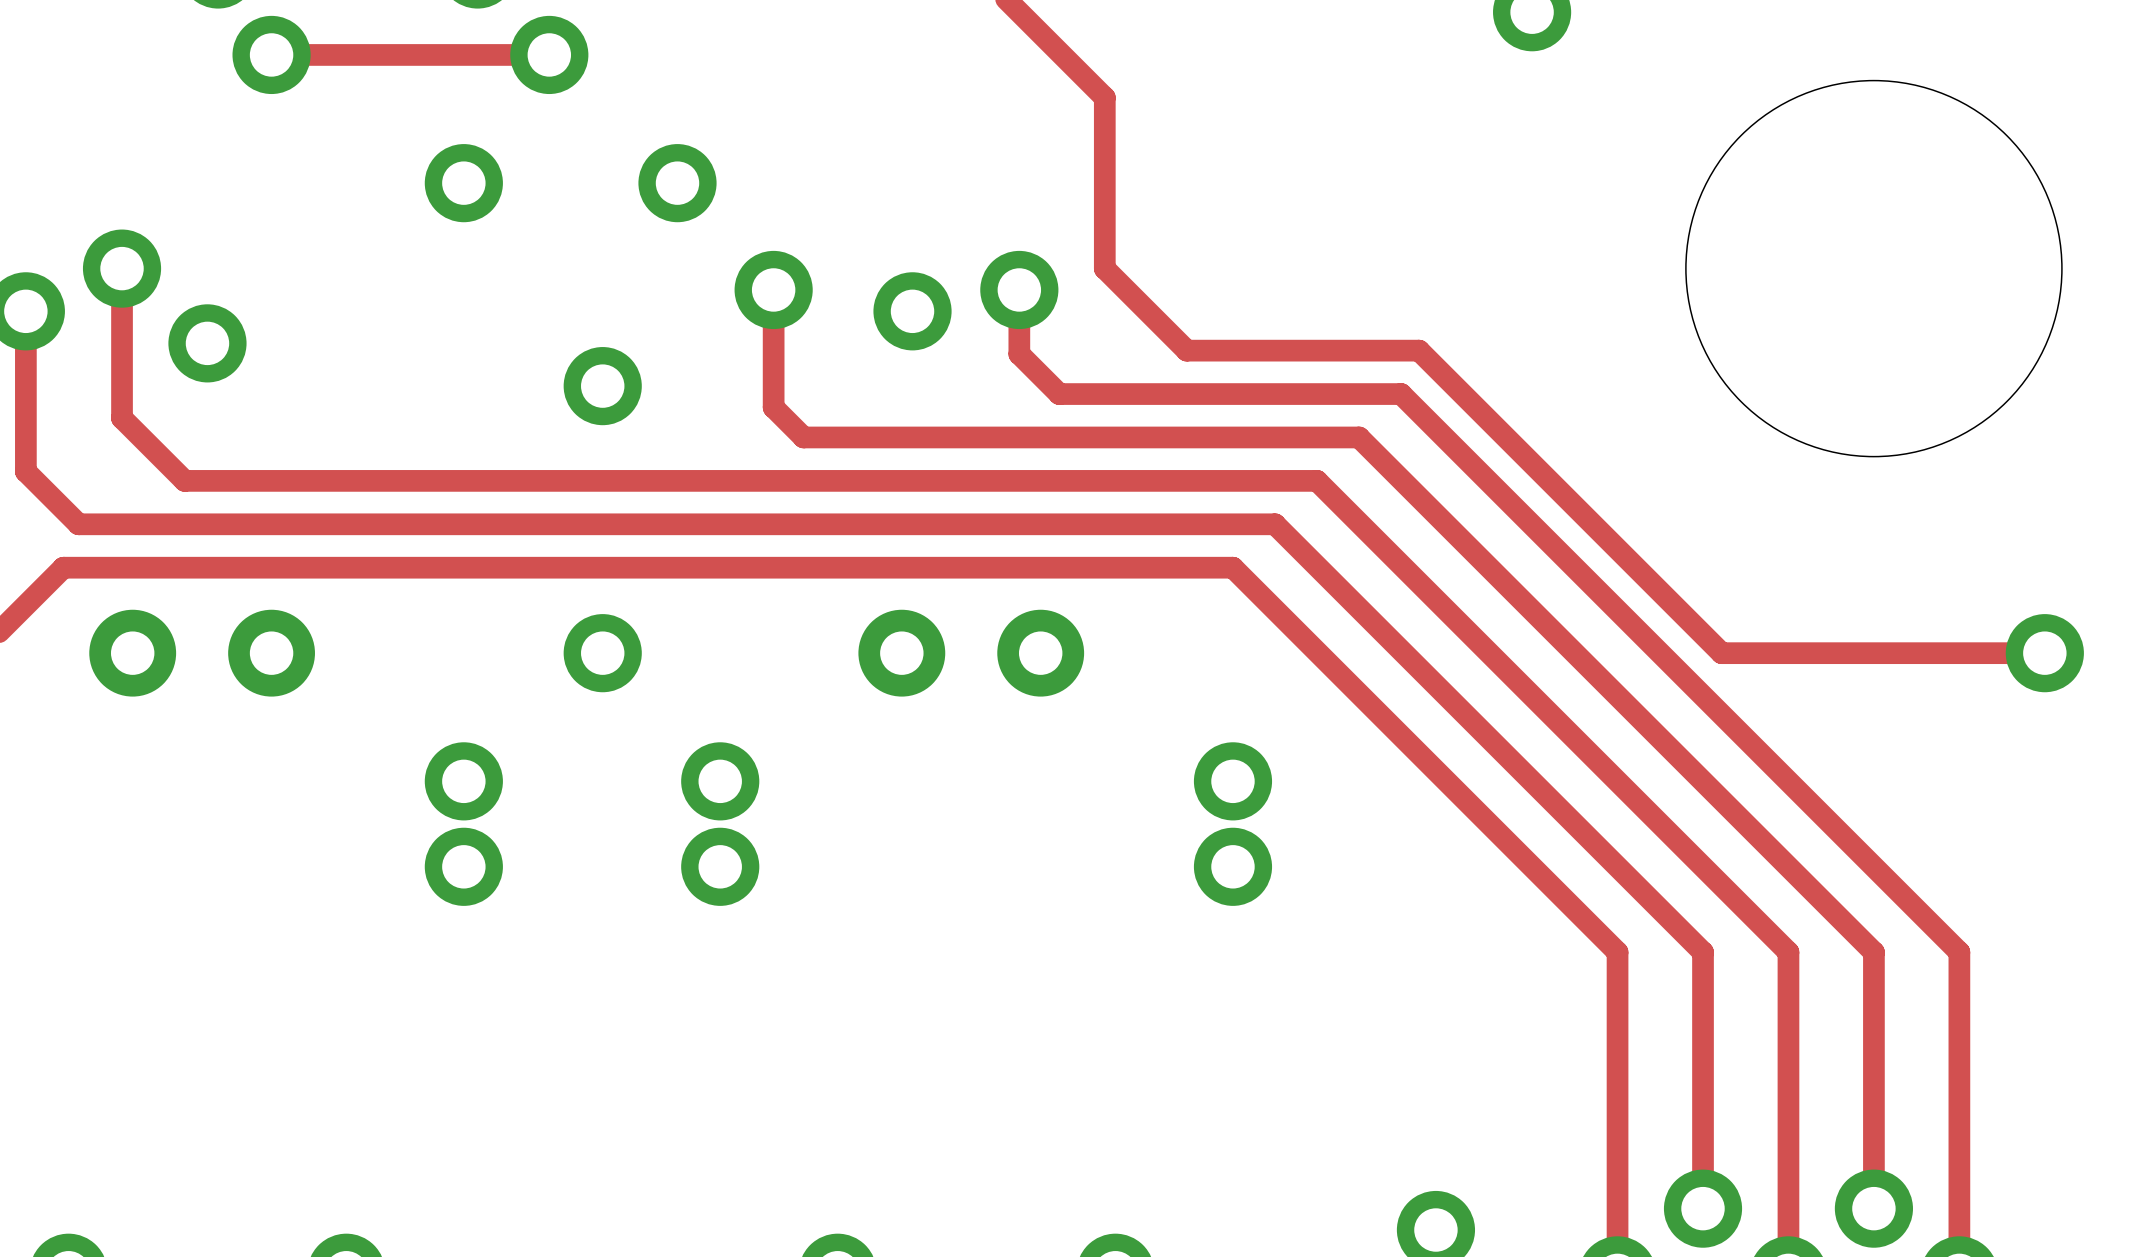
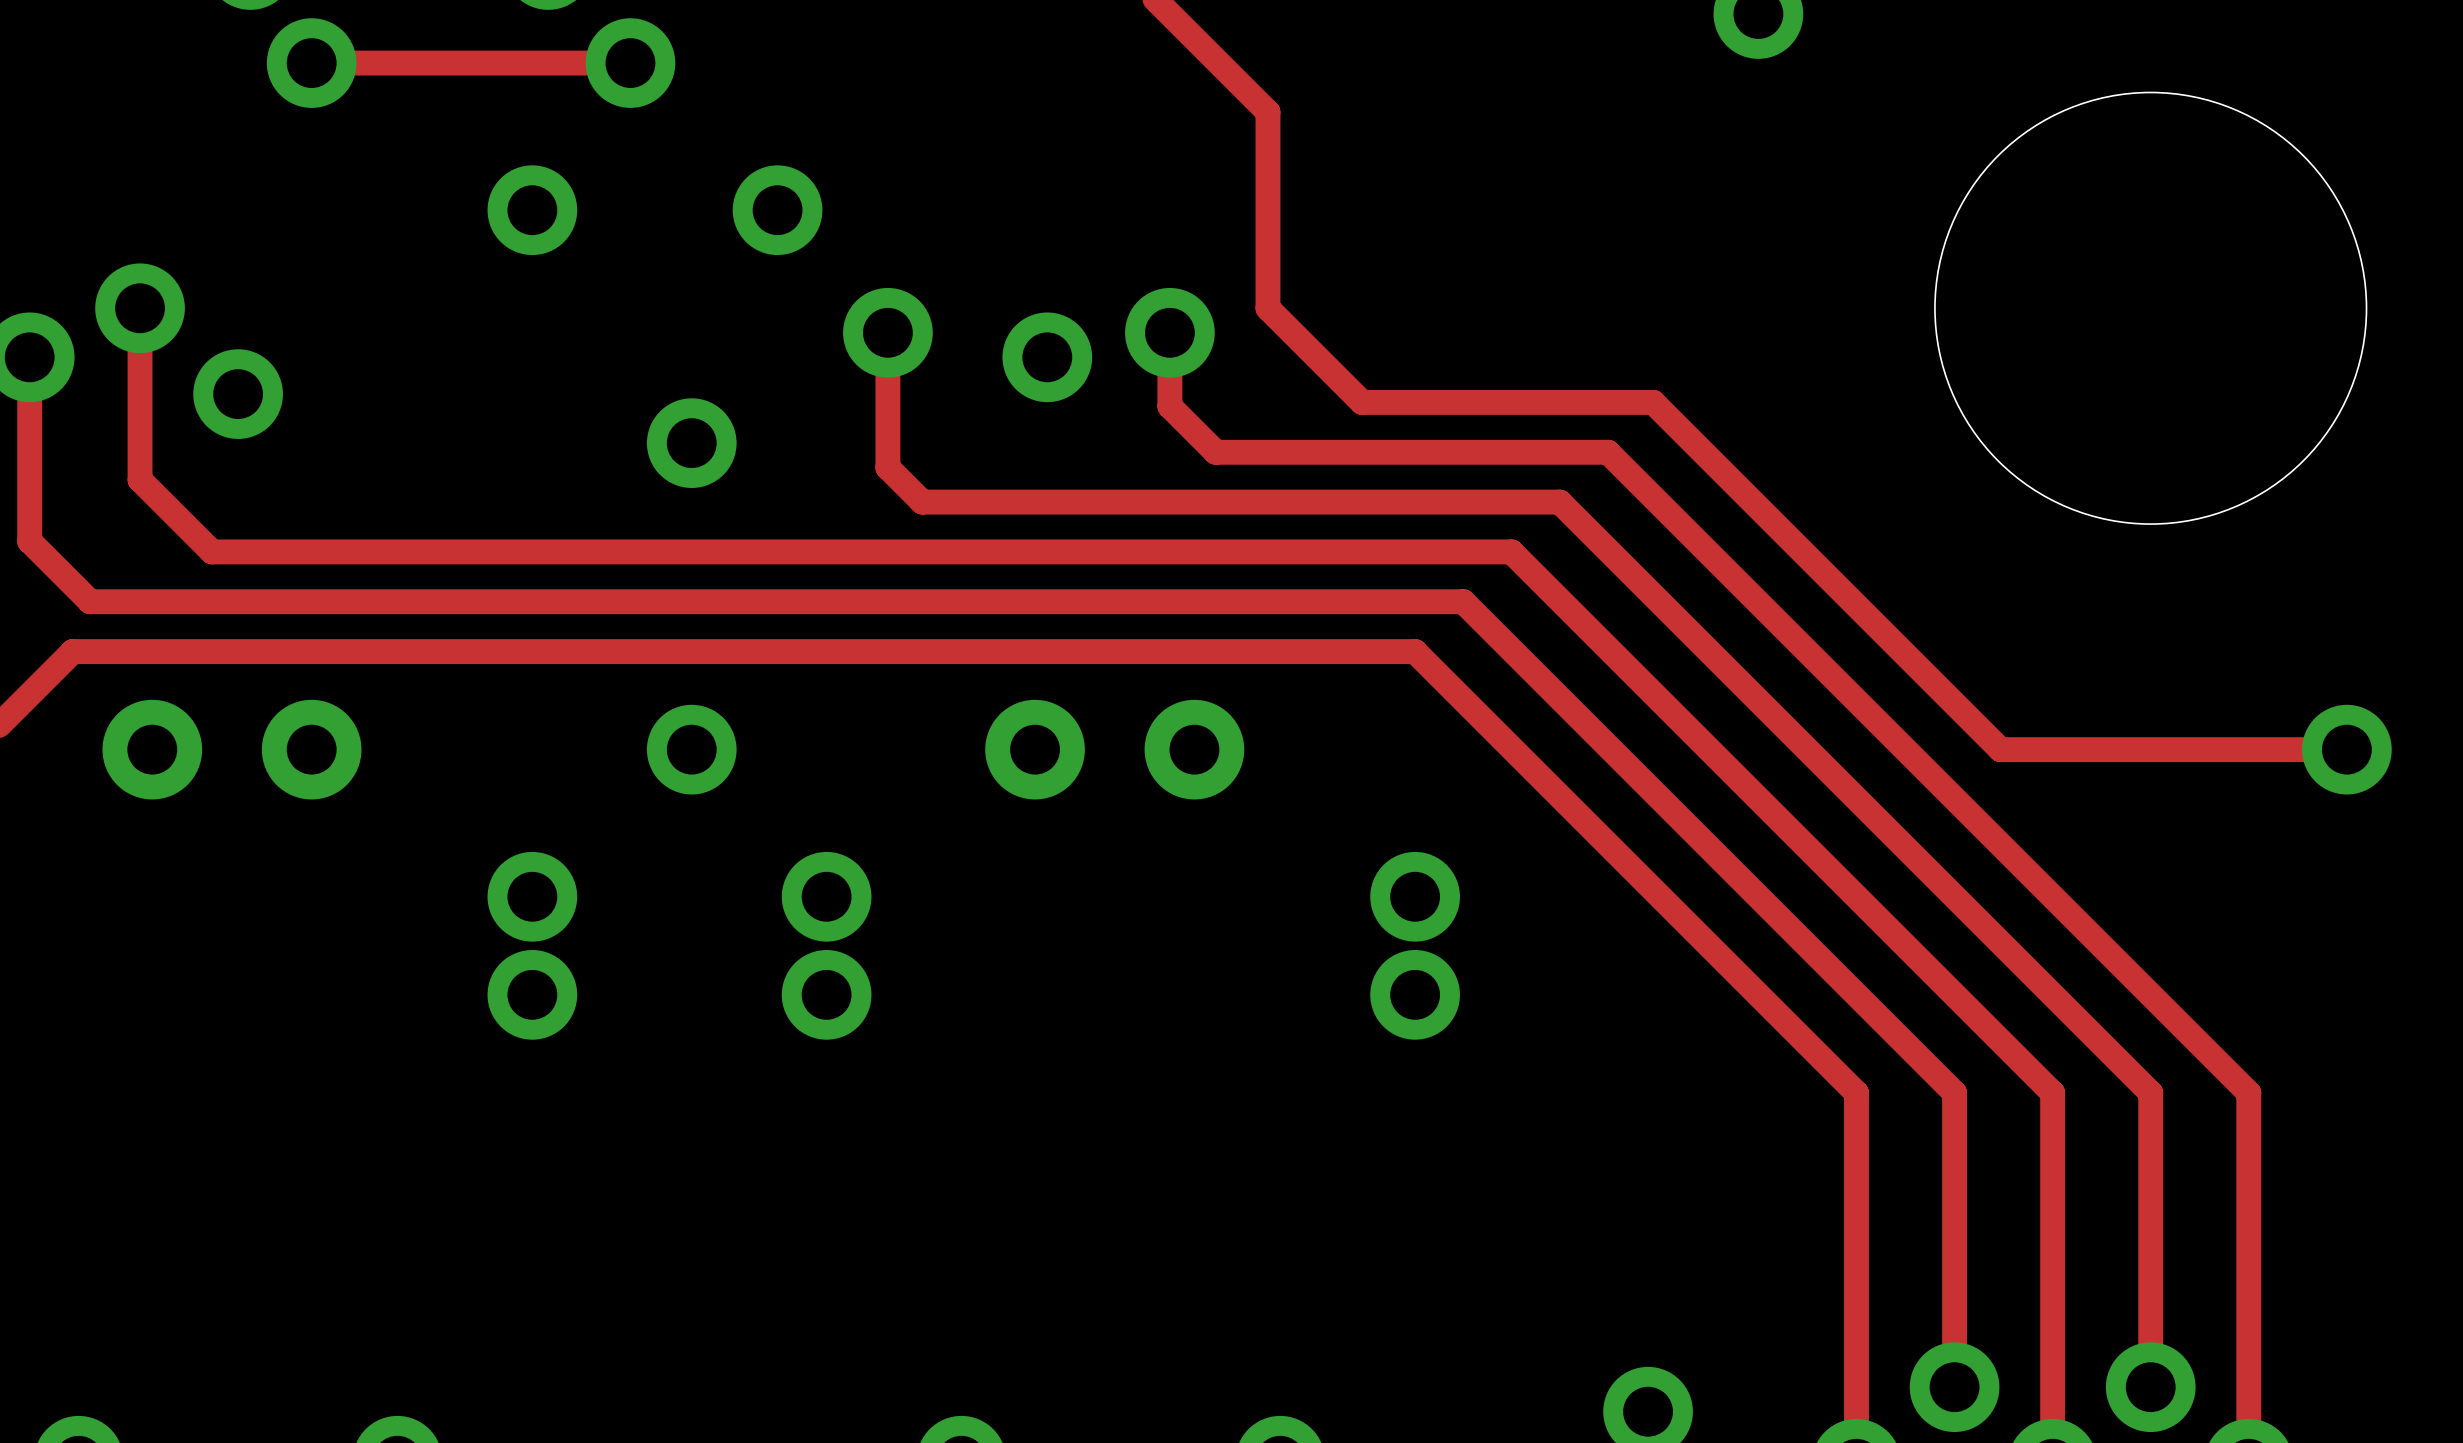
track: (1419, 350) (1721, 653) (1743, 653) -> (1628, 402) (1653, 402) (2000, 749)

